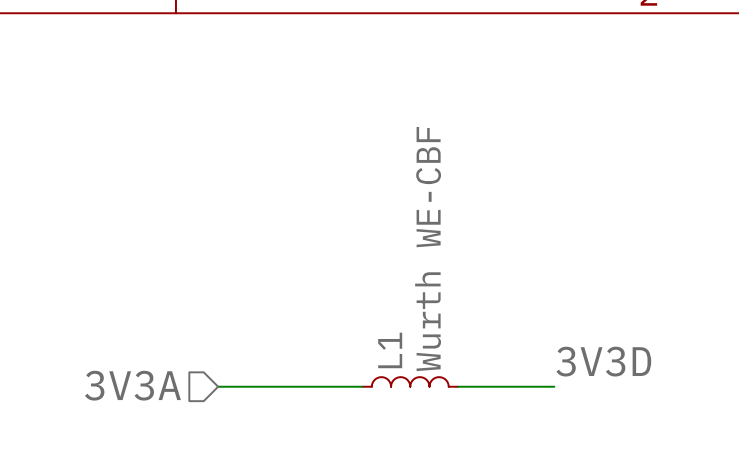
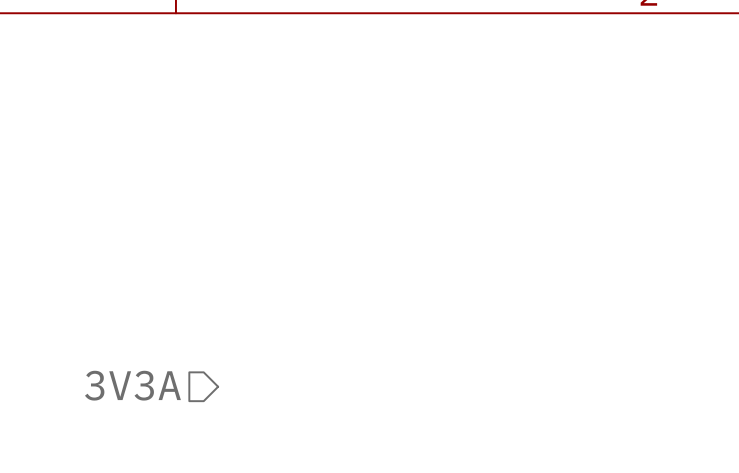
label: 3V3D (603, 361) -> none
L1: Wurth WE-CBF (410, 381) -> none
wire: (218, 386) (362, 386) -> none
wire: (458, 386) (554, 386) -> none

